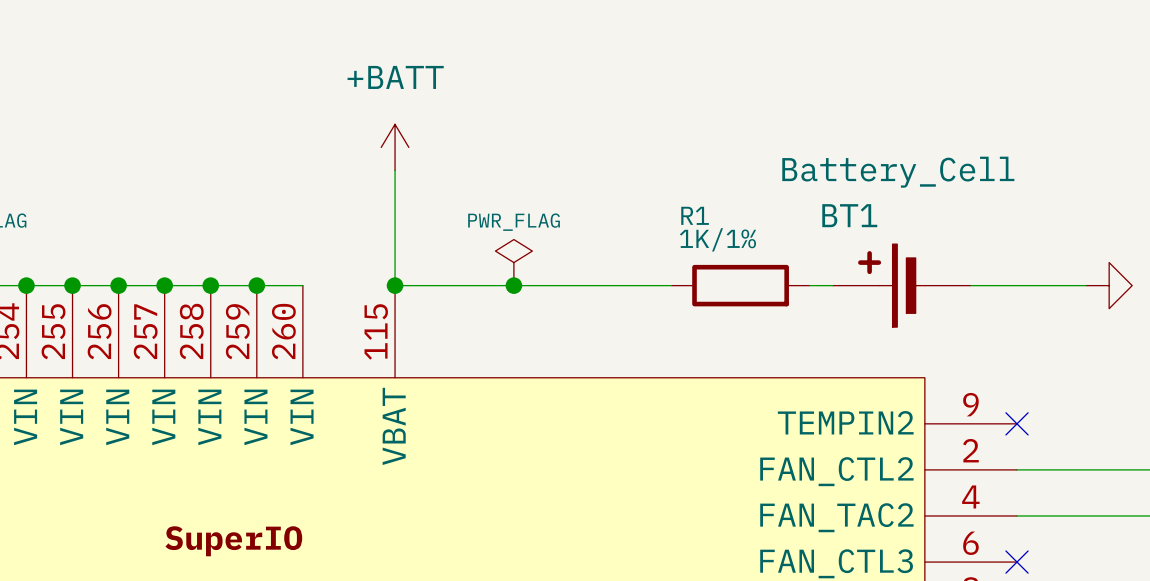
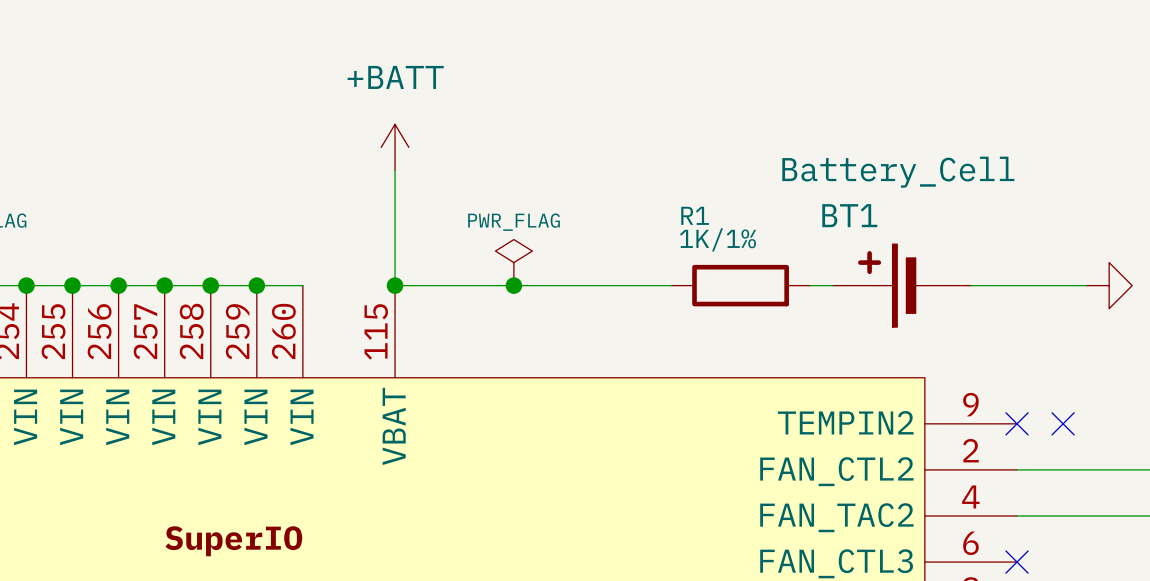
no-connect mark: none -> (1063, 423)

